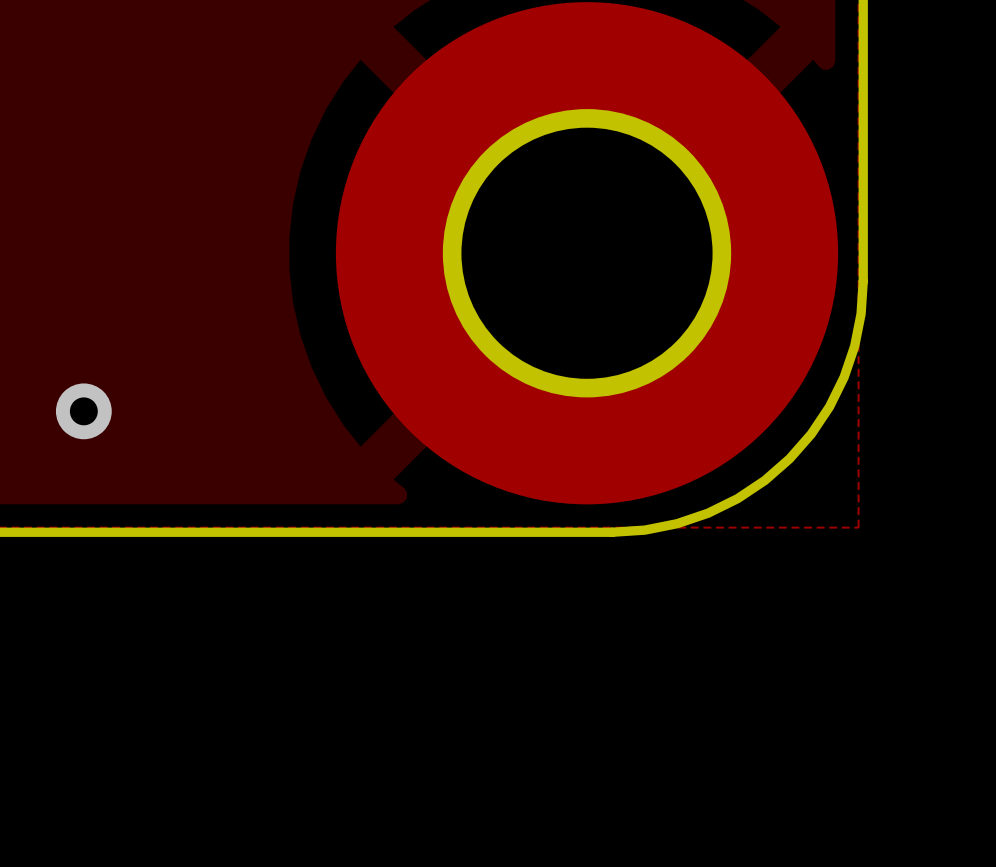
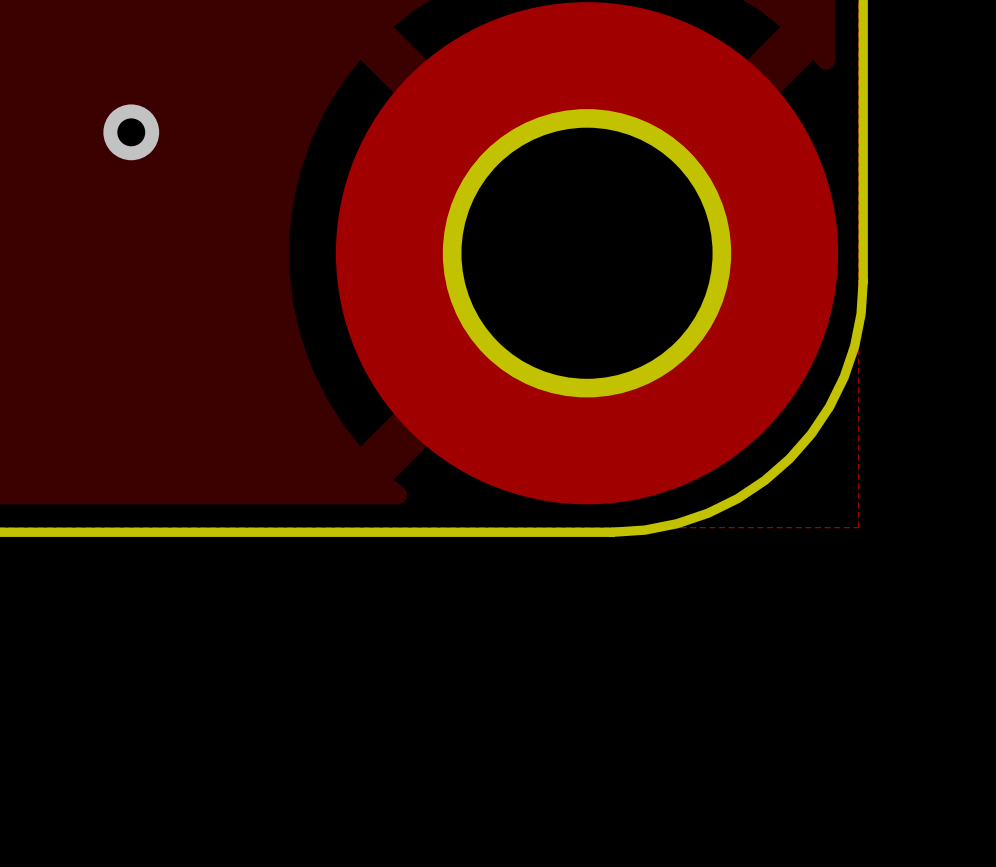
via: none -> (131, 132)
via: (83, 411) -> none

